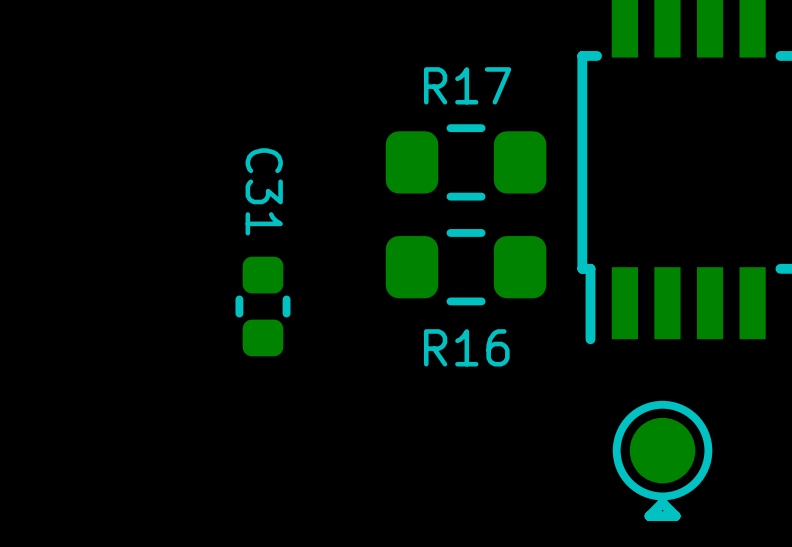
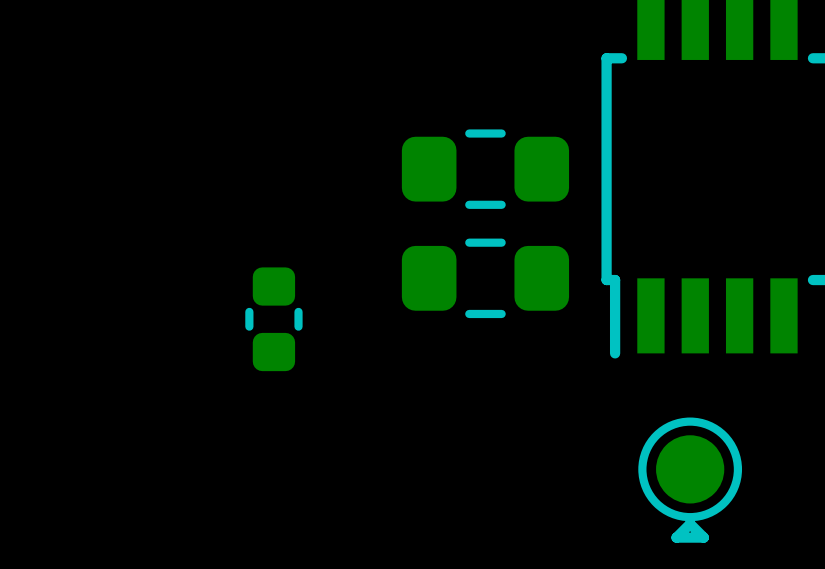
R17 name: R17 (467, 85) -> none
C31 name: C31 (264, 191) -> none
R16 name: R16 (466, 347) -> none

